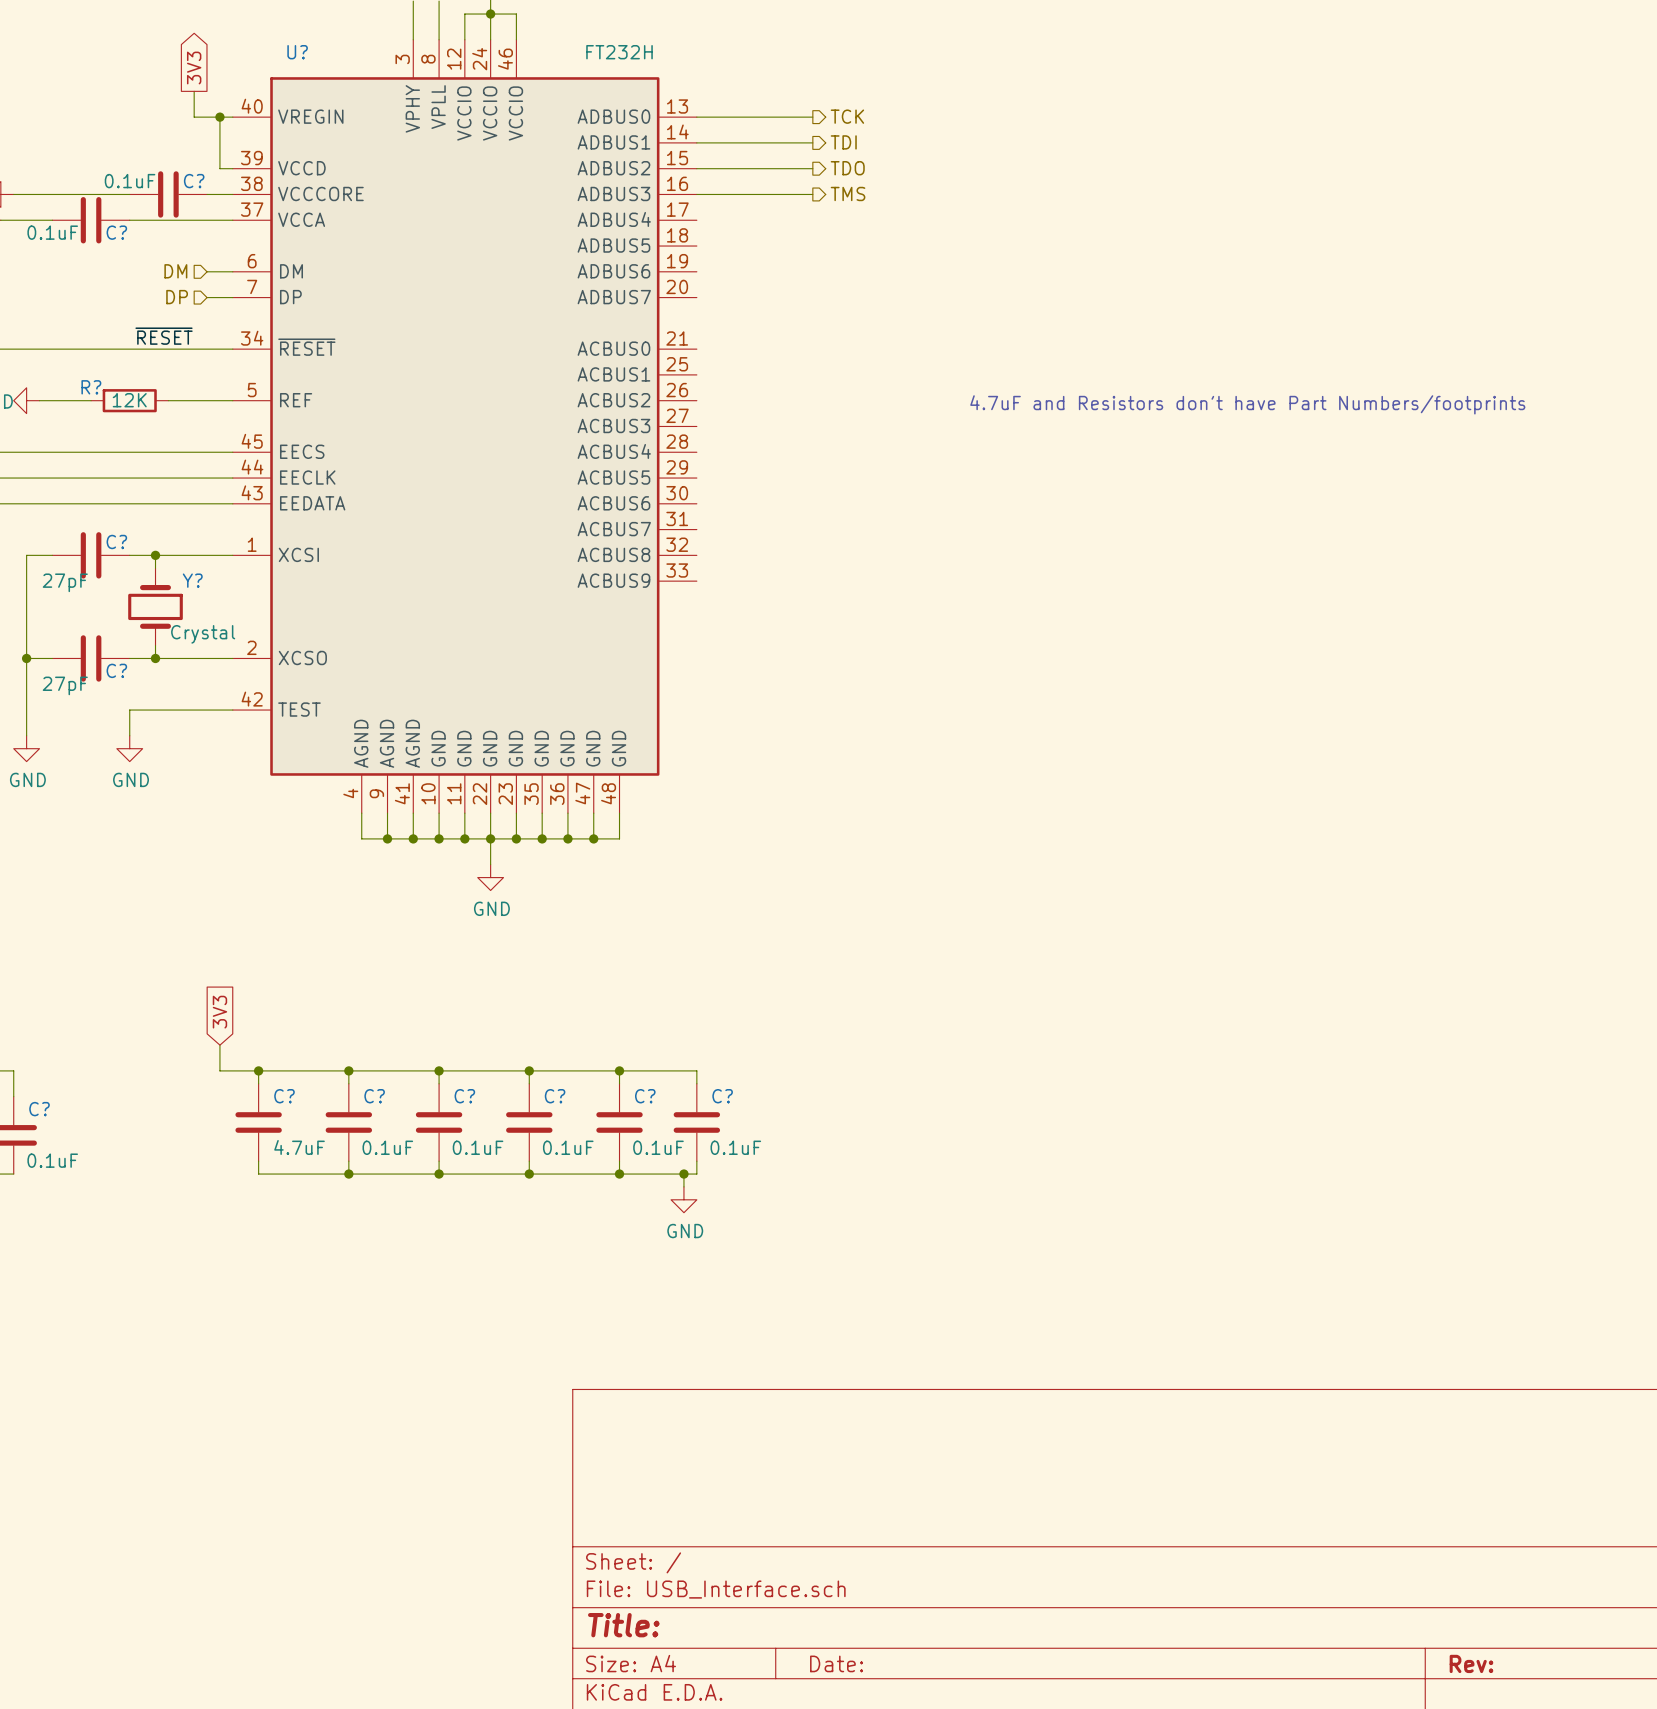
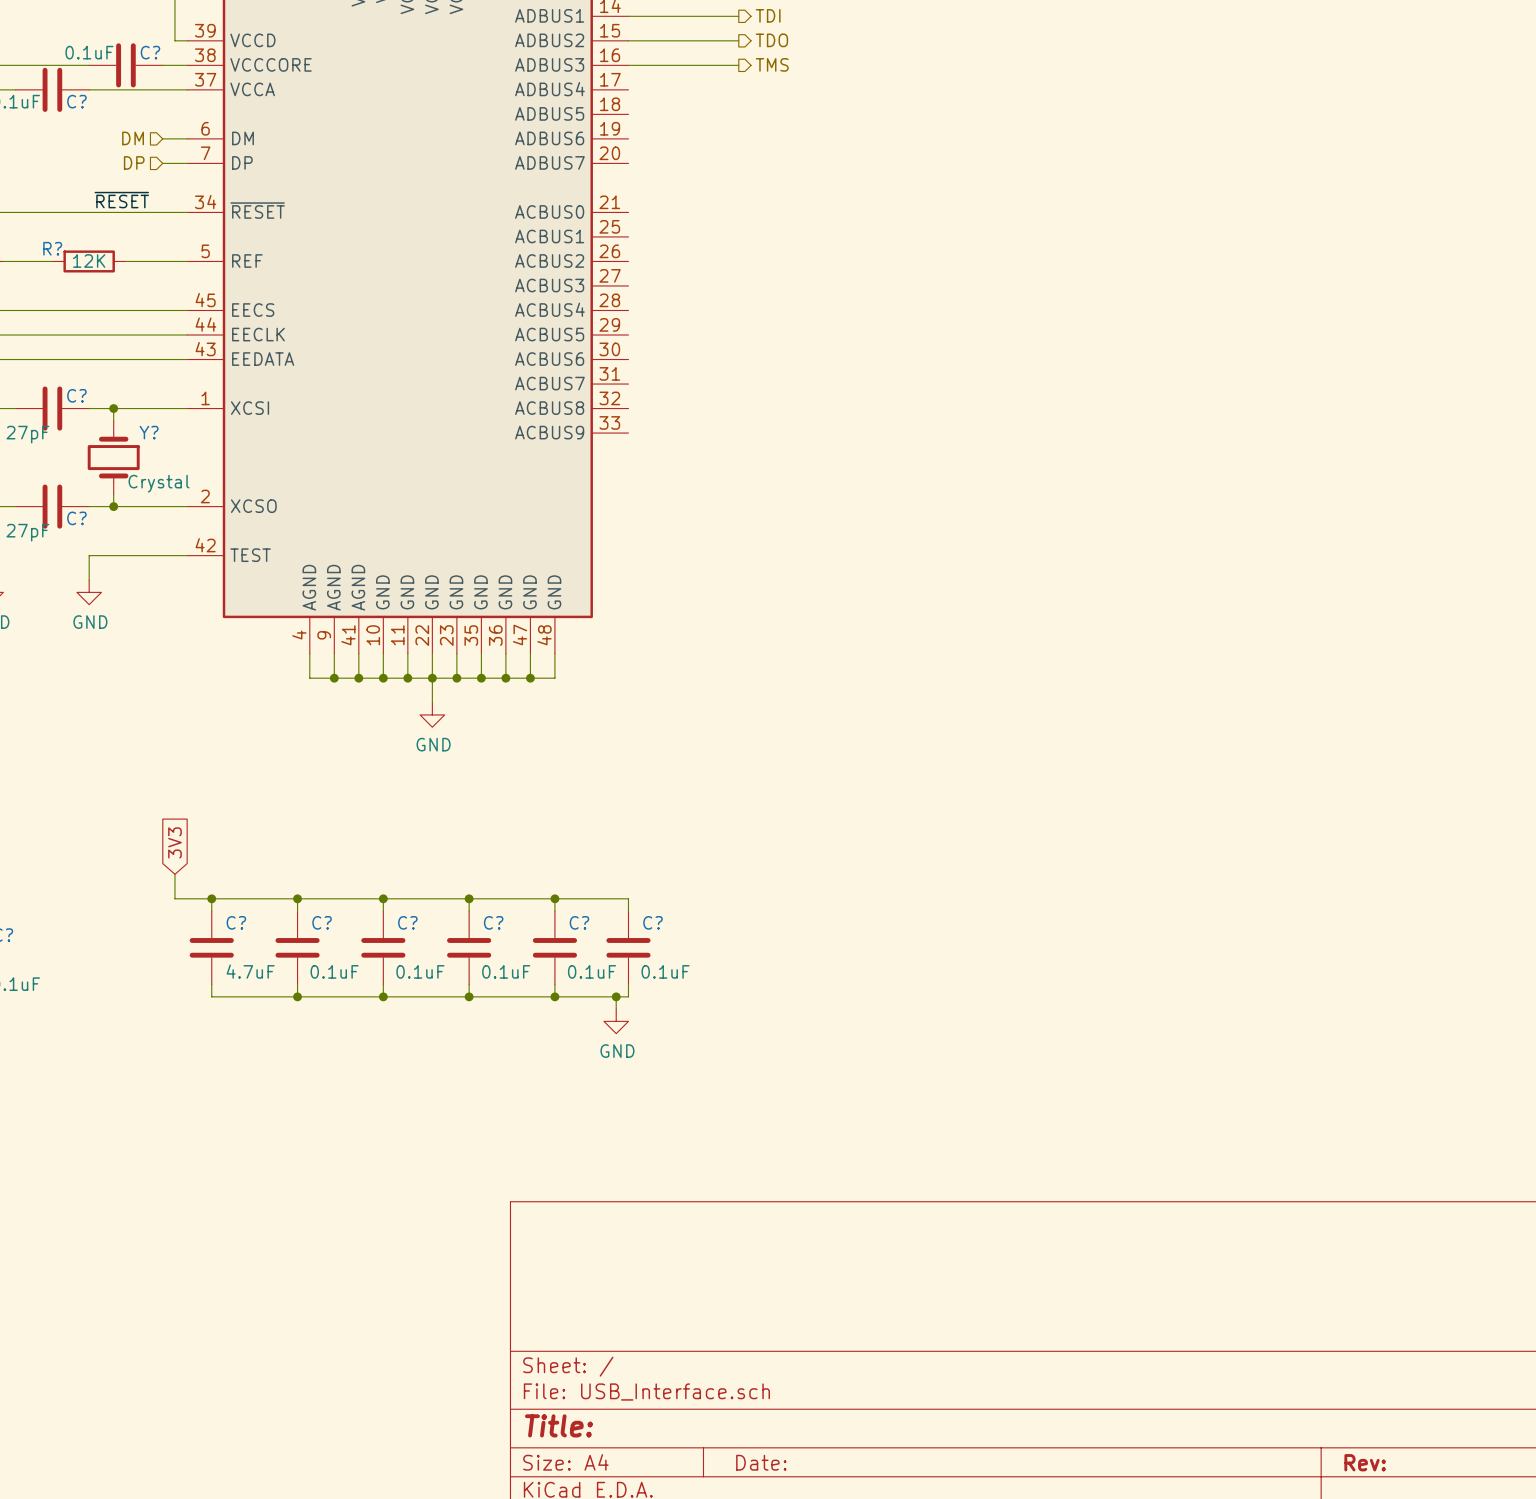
text: 4.7uF and Resistors don't have Part Numbers/footprints (1247, 404) -> none

